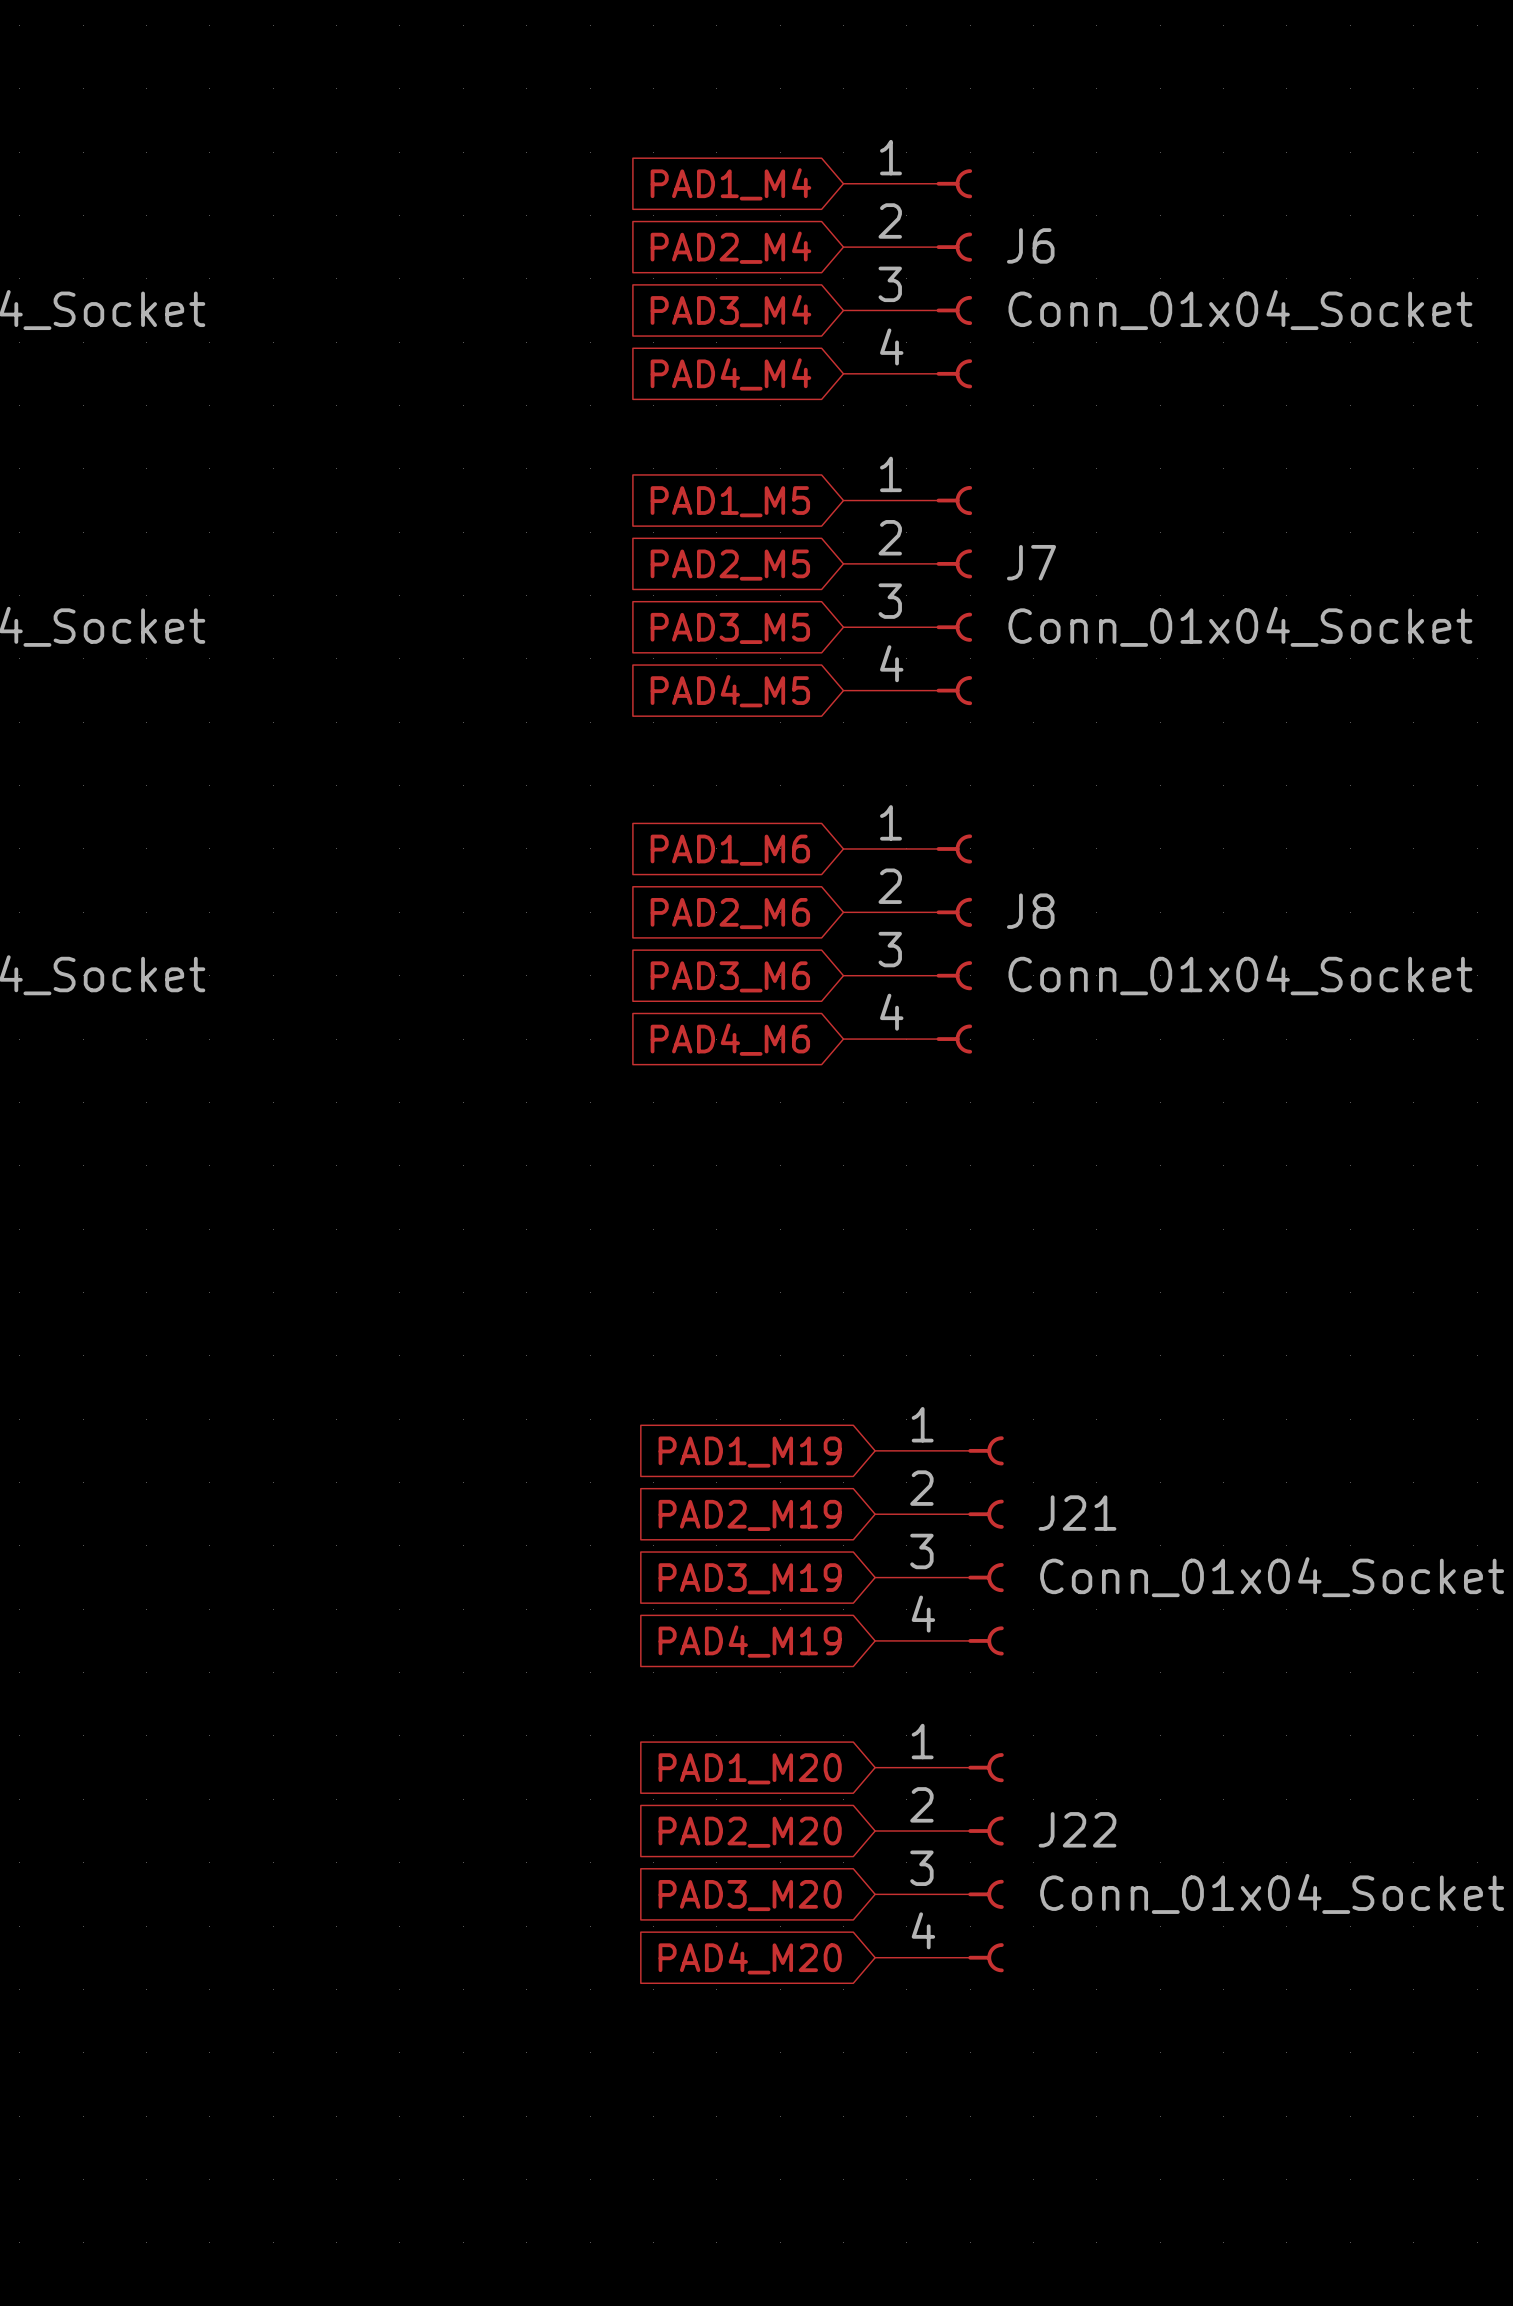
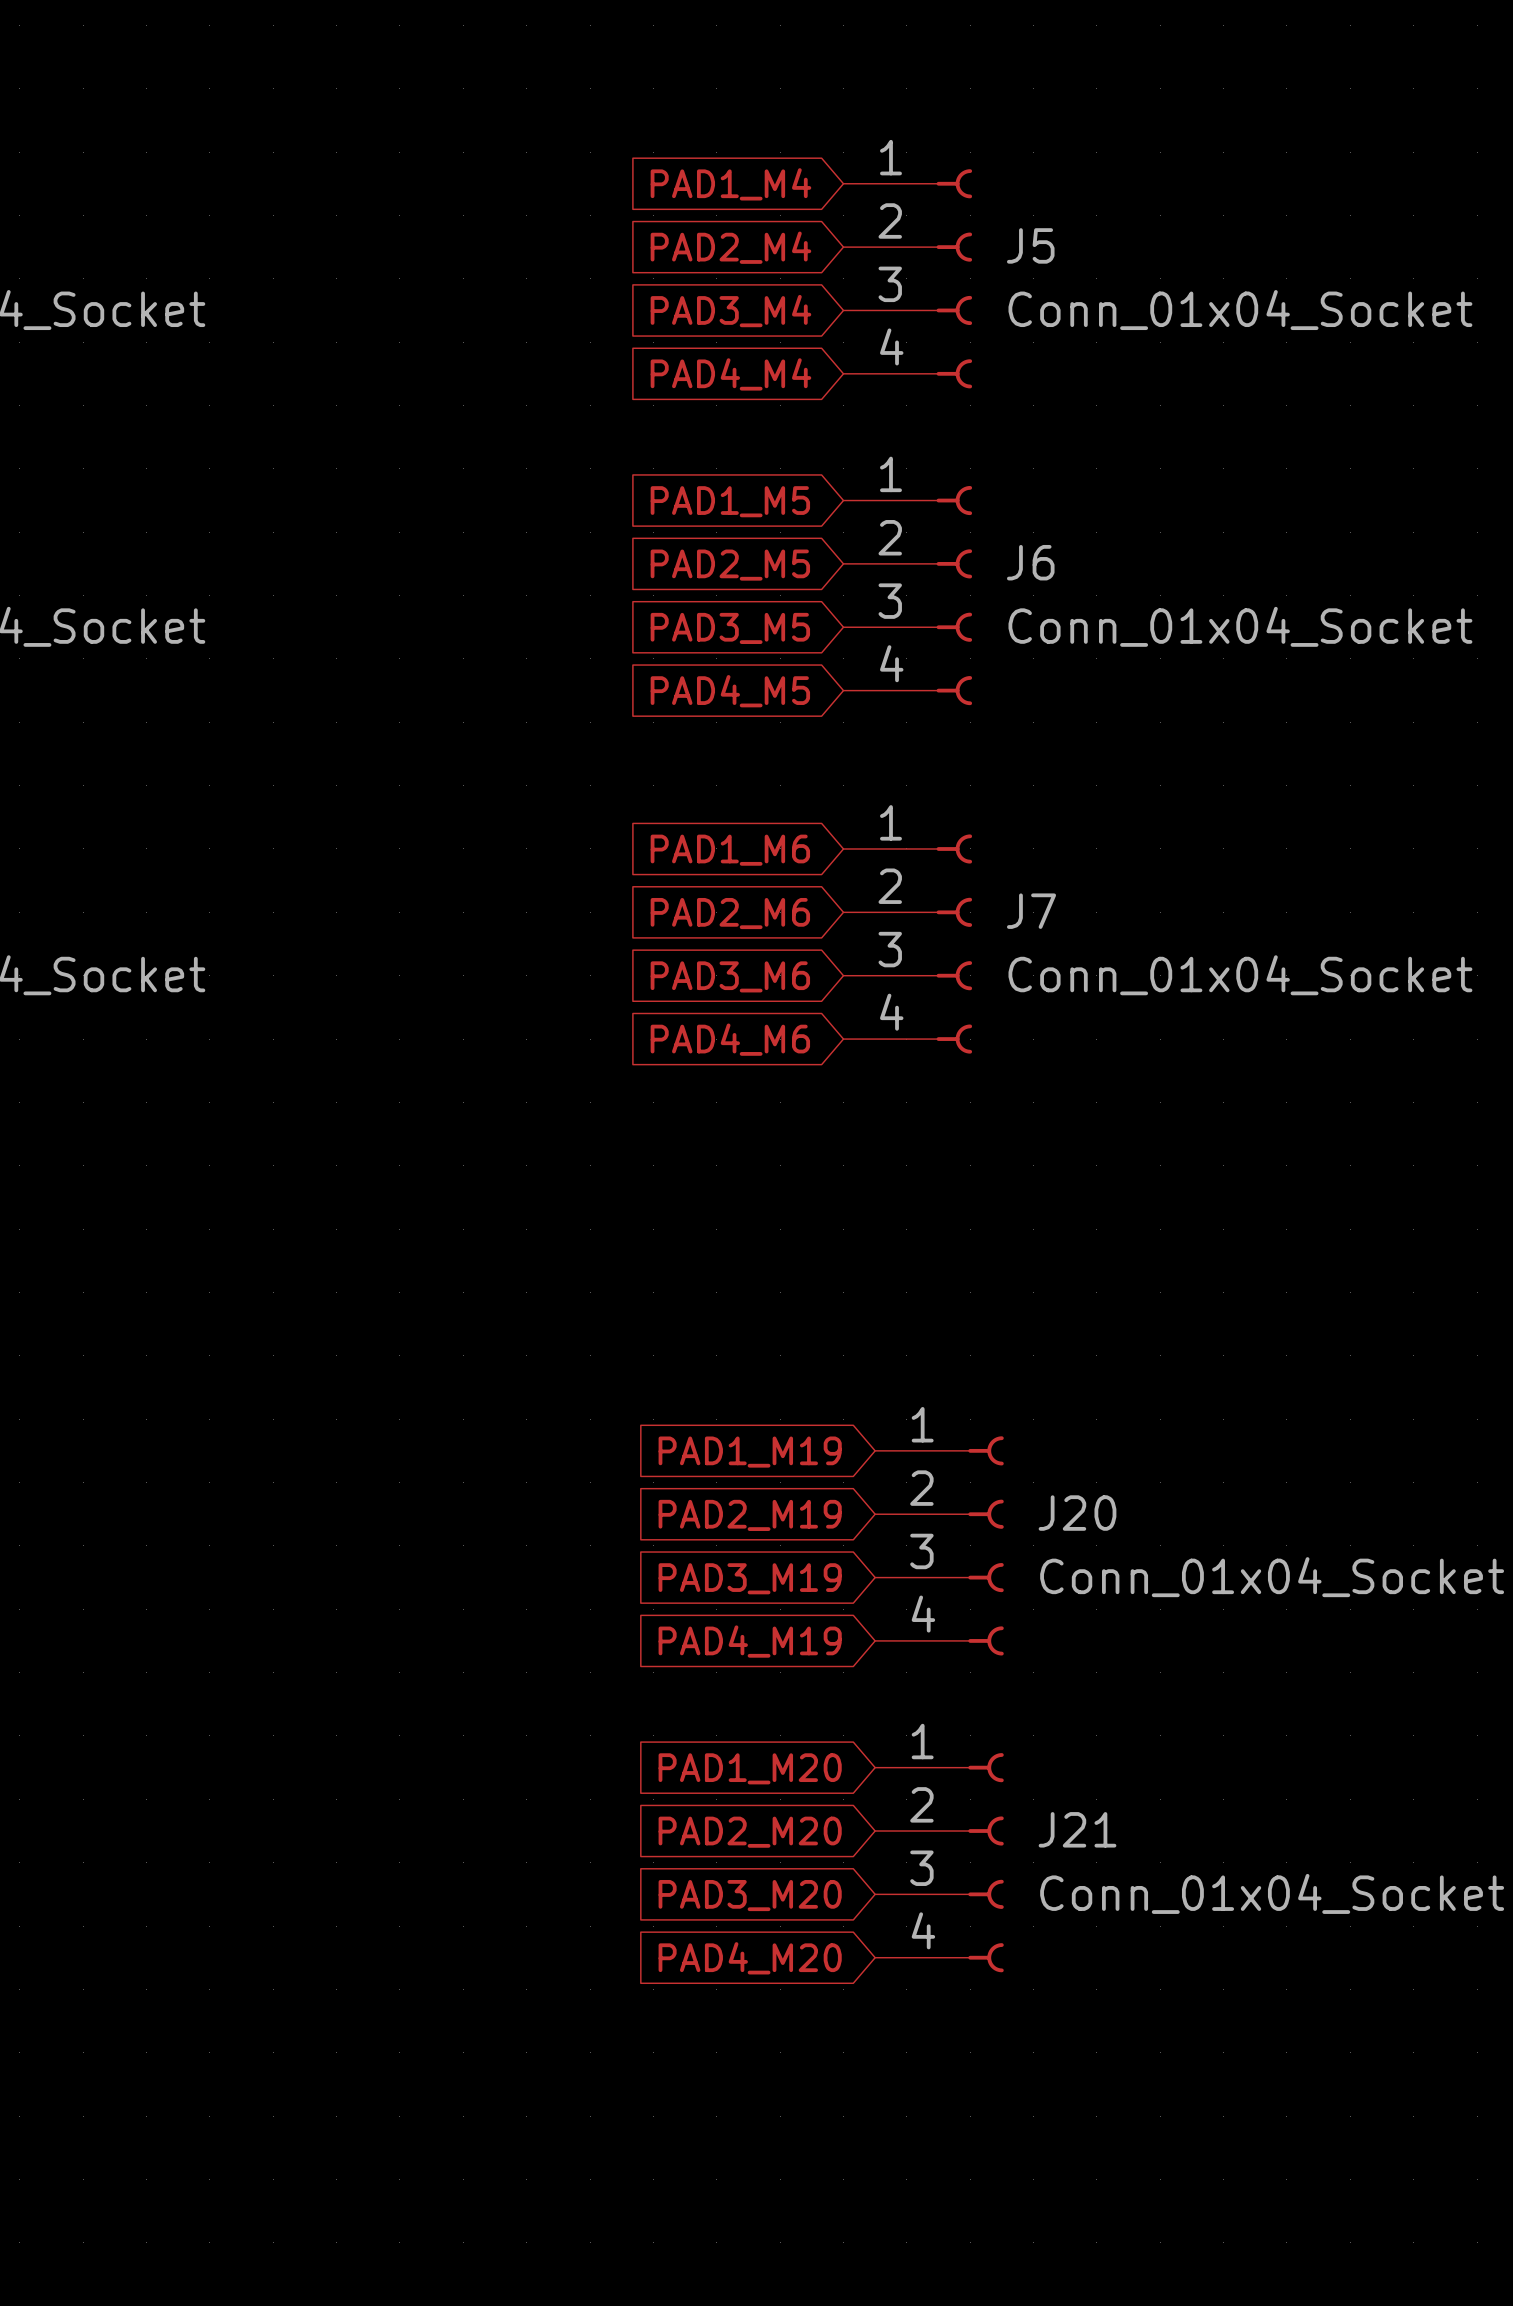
J6 name: J6 (1030, 245) -> J5 (1030, 245)
J7 name: J7 (1031, 562) -> J6 (1030, 562)
J8 name: J8 (1030, 911) -> J7 (1031, 911)
J21 name: J21 (1077, 1513) -> J20 (1077, 1513)
J22 name: J22 (1077, 1829) -> J21 (1077, 1829)

